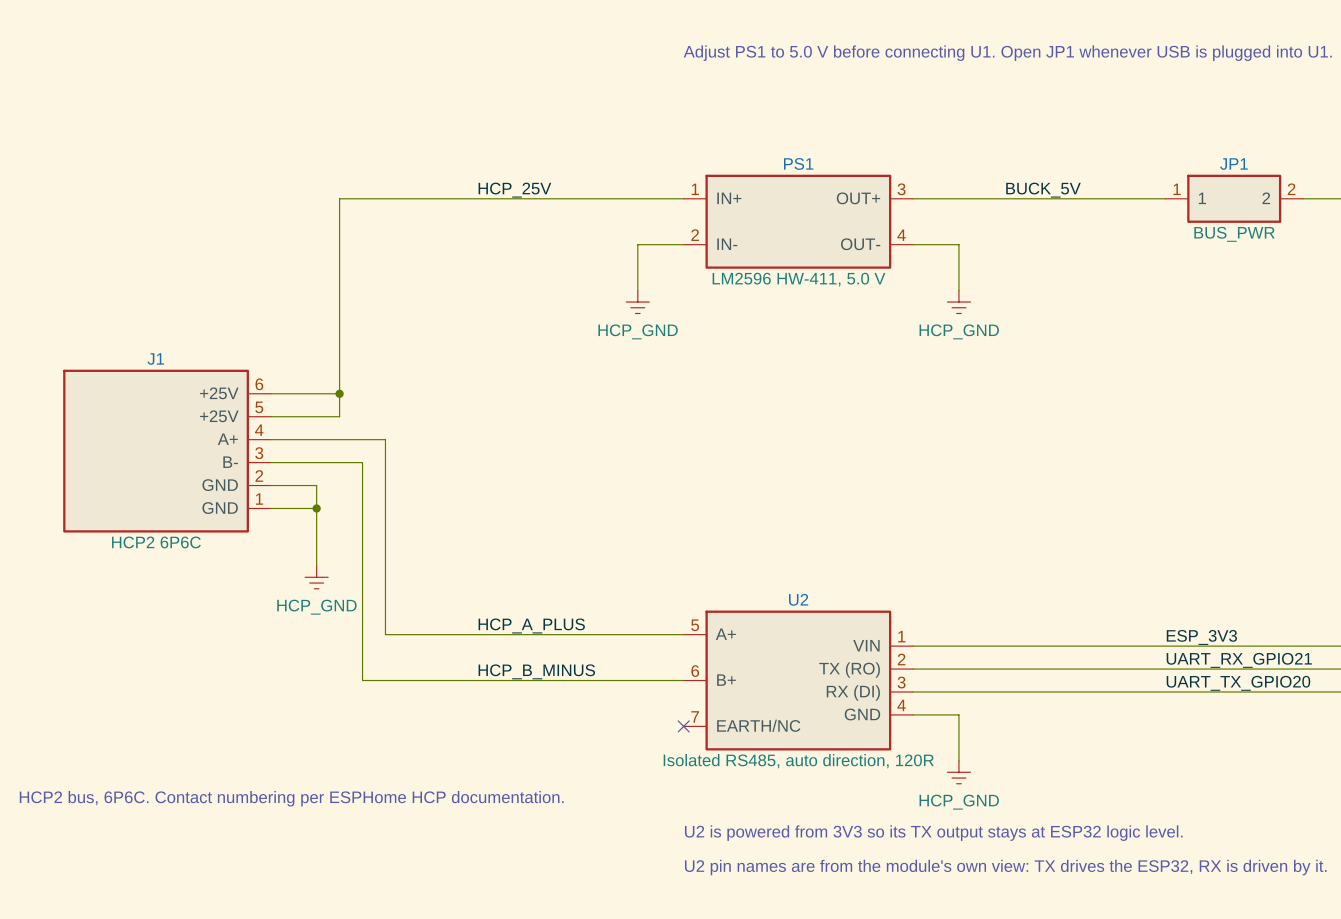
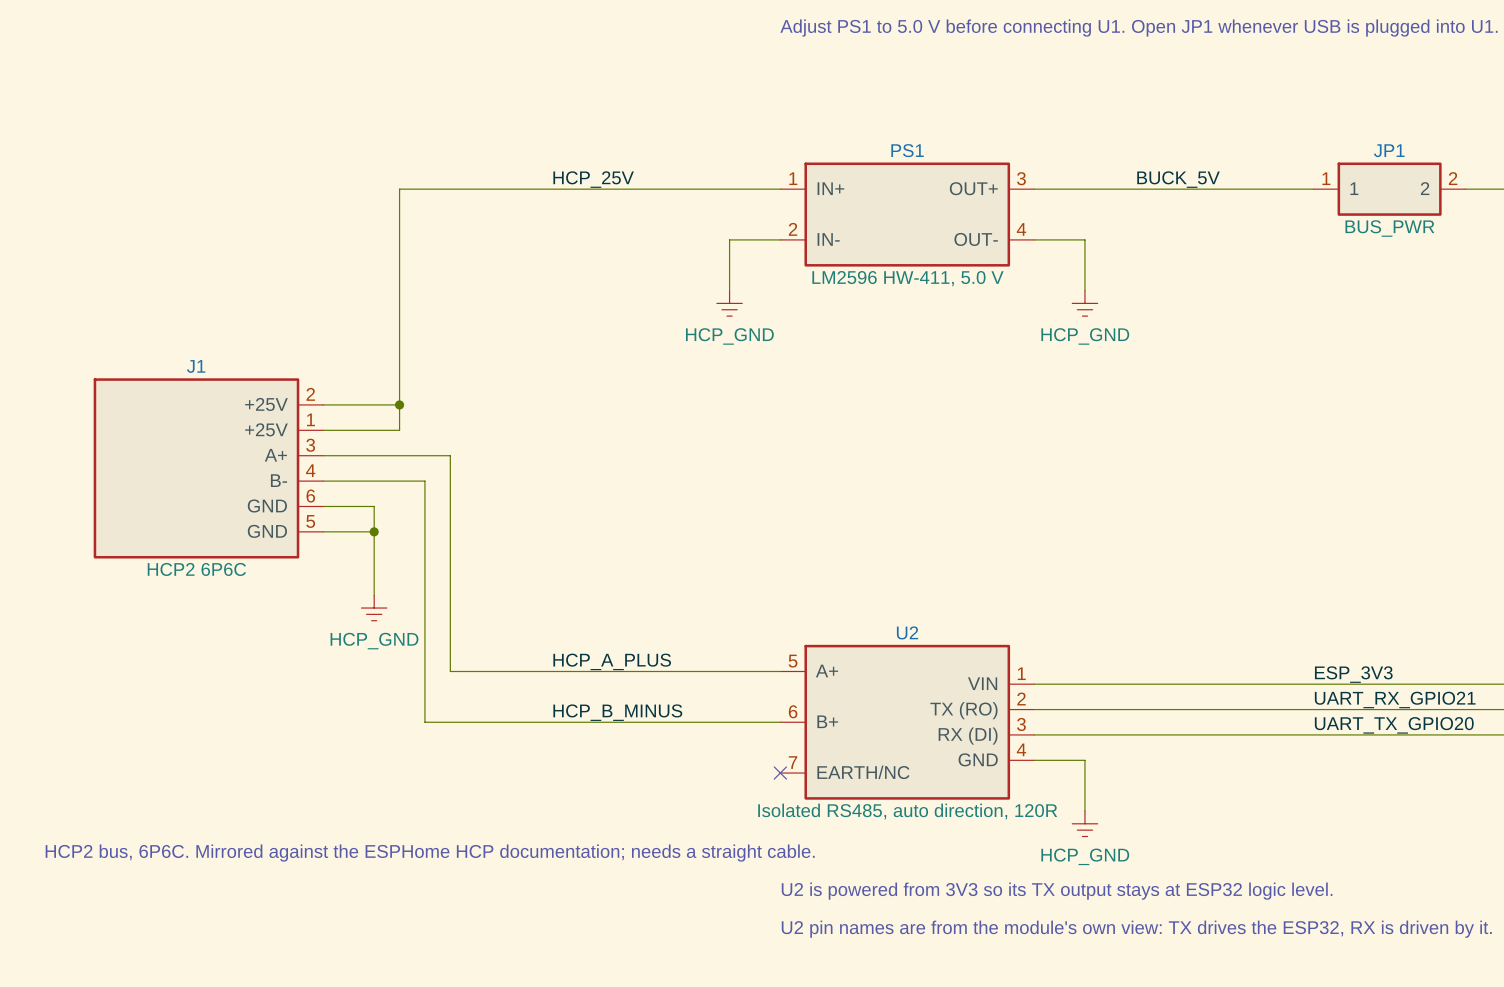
J1 pin number: 6 (259, 384) -> 2 (310, 394)
J1 pin number: 5 (259, 407) -> 1 (310, 419)
J1 pin number: 4 (259, 430) -> 3 (310, 445)
J1 pin number: 3 (259, 453) -> 4 (310, 470)
J1 pin number: 2 (259, 475) -> 6 (310, 496)
J1 pin number: 1 (259, 499) -> 5 (310, 521)
text: HCP2 bus, 6P6C. Contact numbering per ESPHome HCP documentation. (291, 798) -> HCP2 bus, 6P6C. Mirrored against the ESPHome HCP documentation; needs a straight cable. (430, 853)

